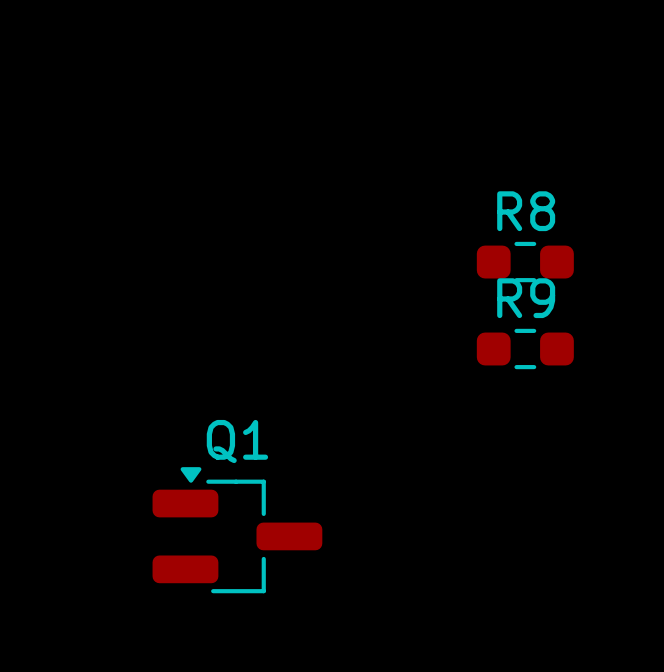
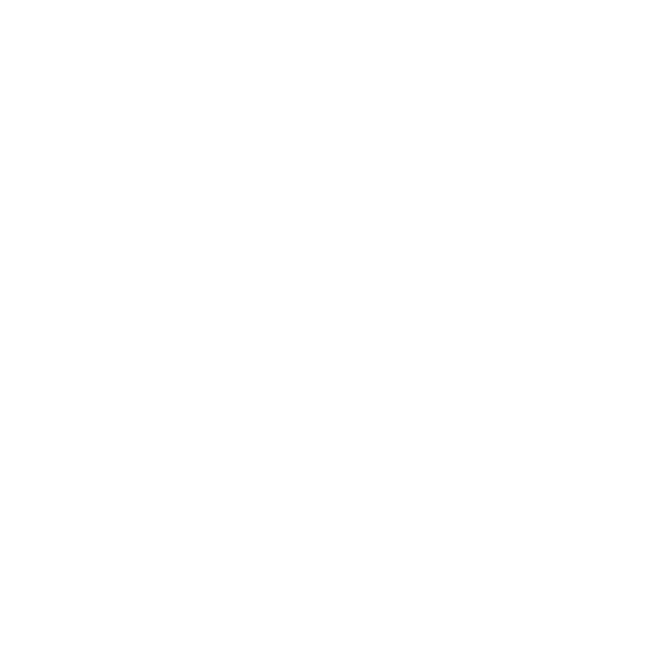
R8: (525, 262) -> none
R9: (525, 349) -> none
Q1: (237, 530) -> none

